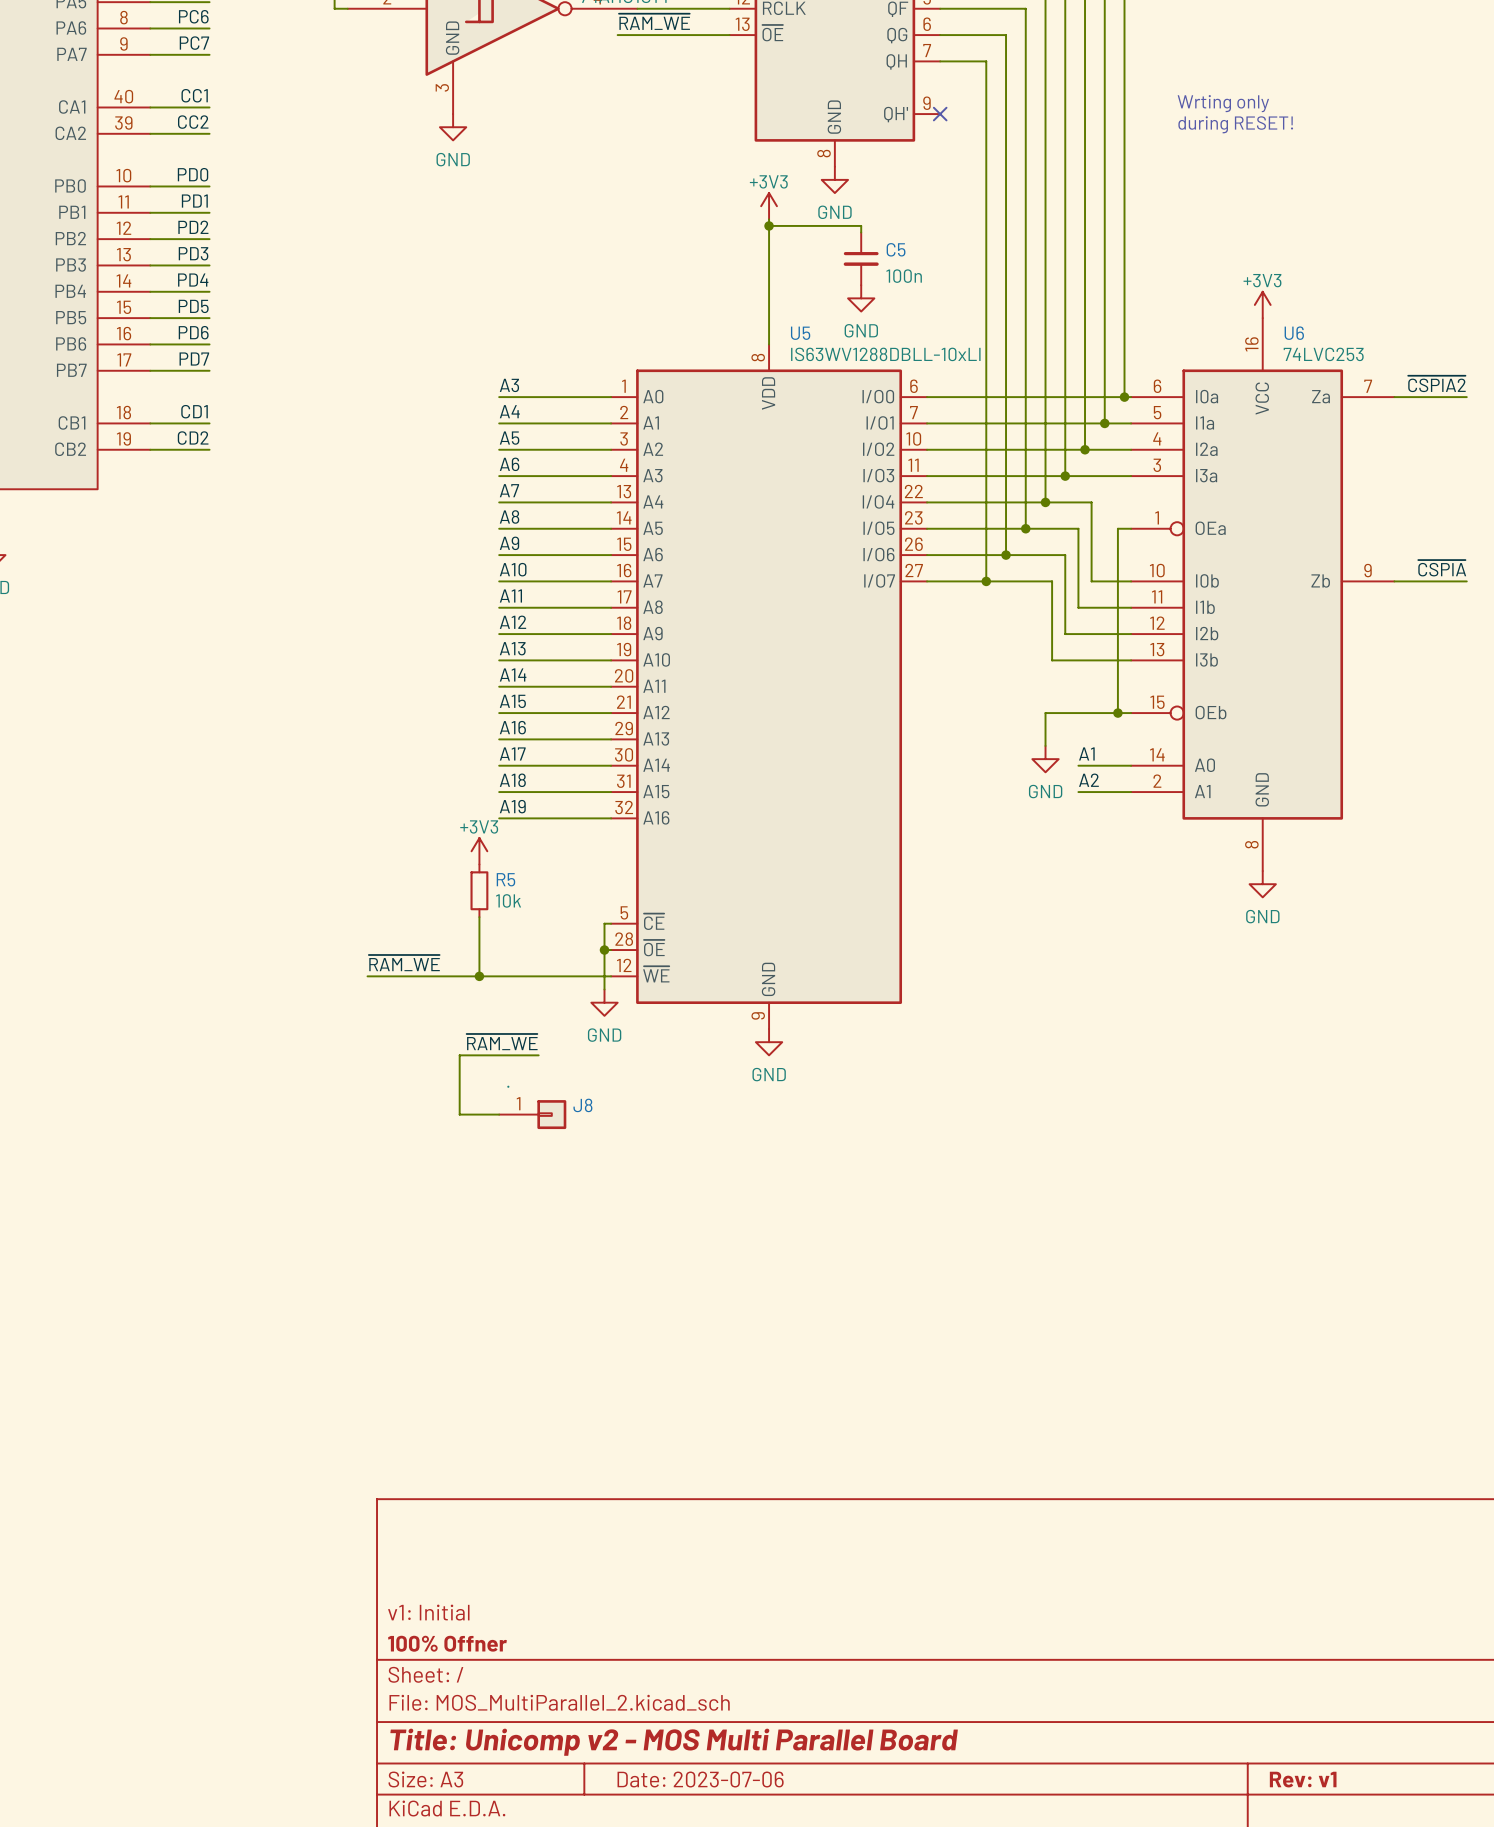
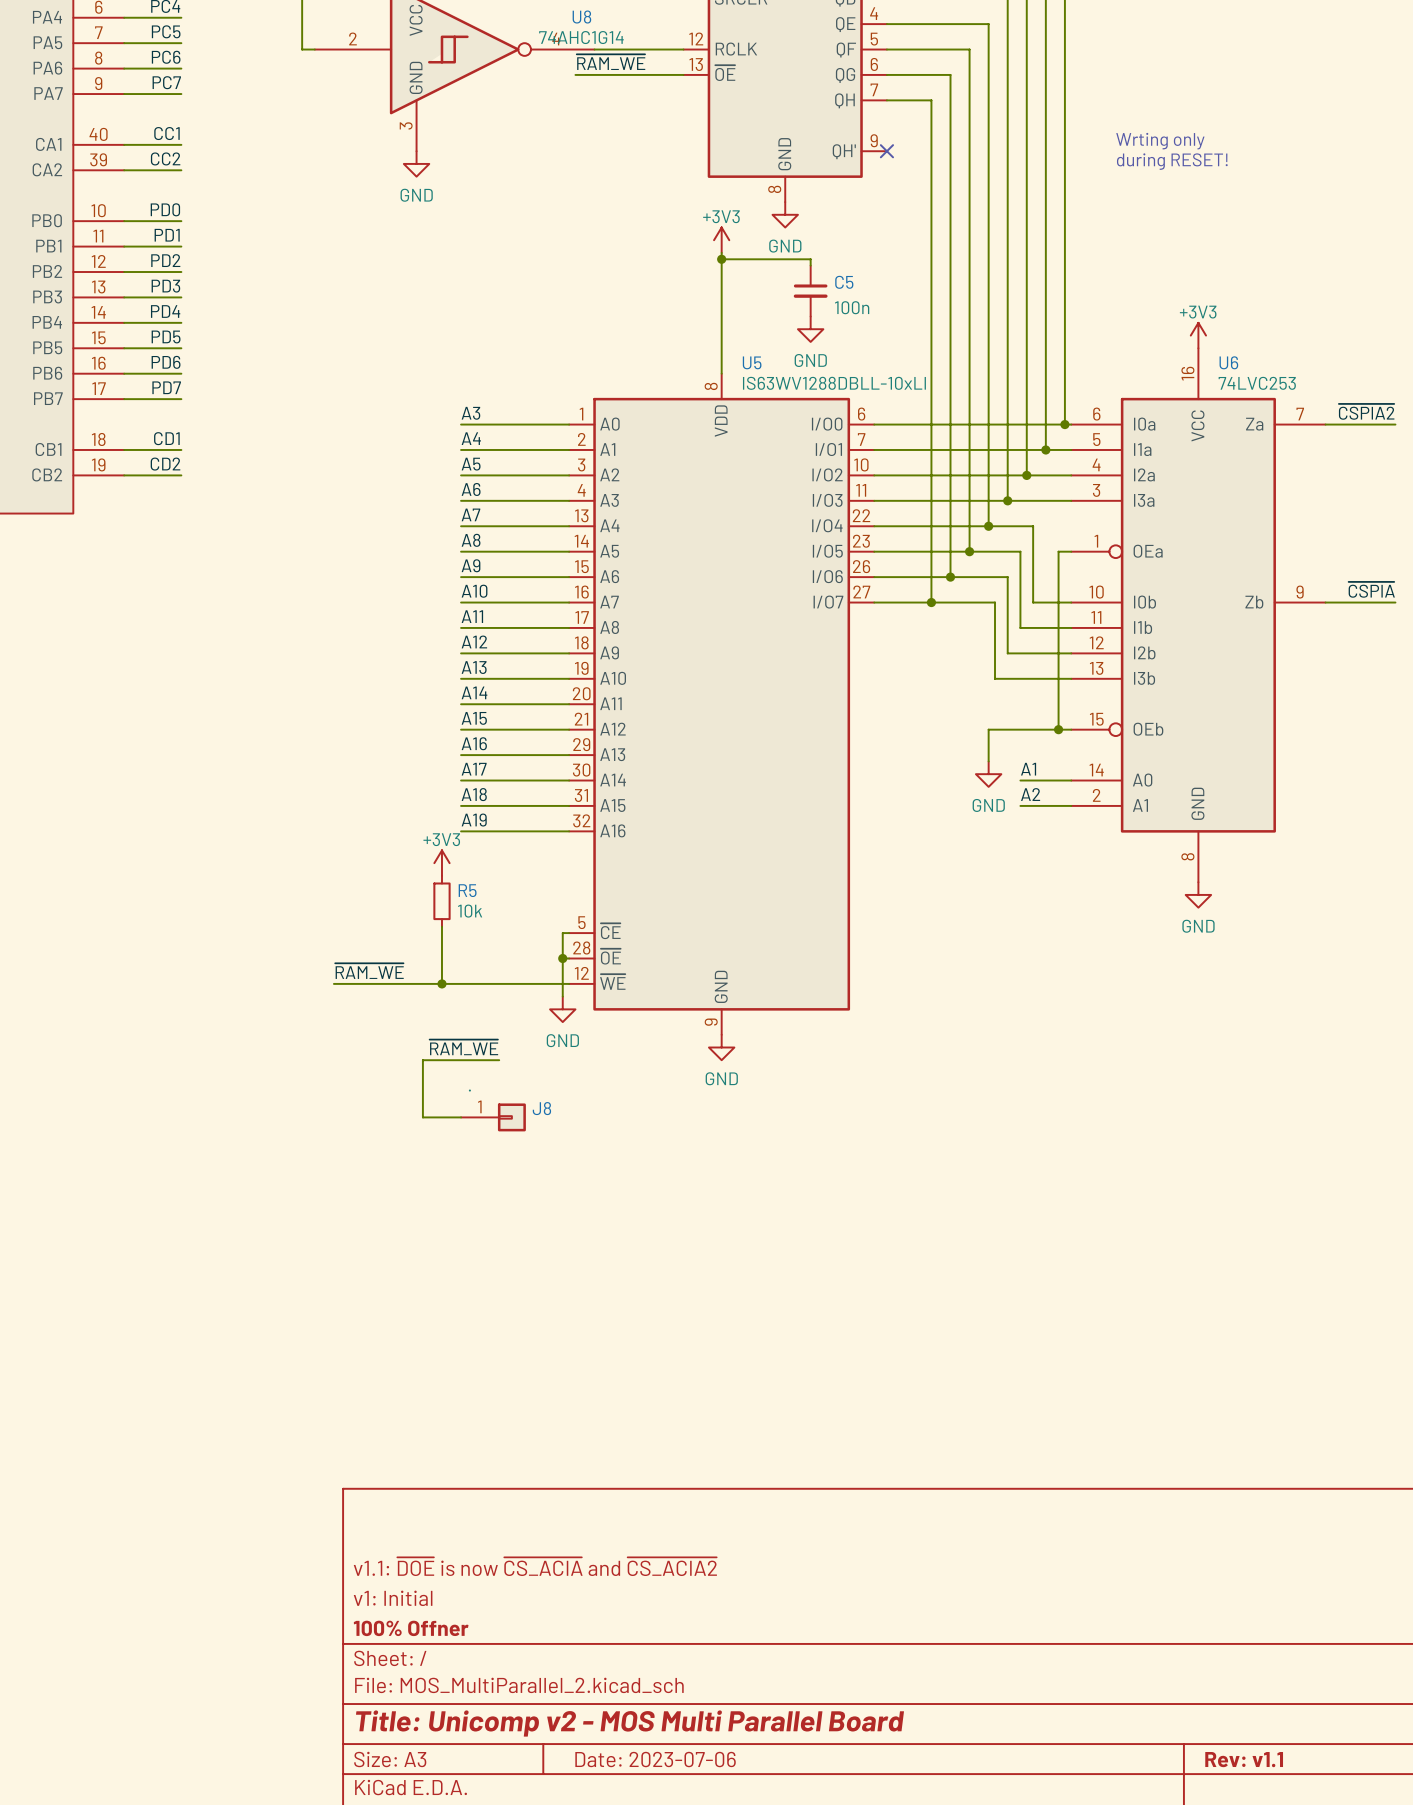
title block: none -> v1.1: ~{DOE} is now ~{CS_ACIA} and ~{CS_ACIA2} (535, 1566)
title block: Rev: v1 (1303, 1779) -> Rev: v1.1 (1244, 1759)

